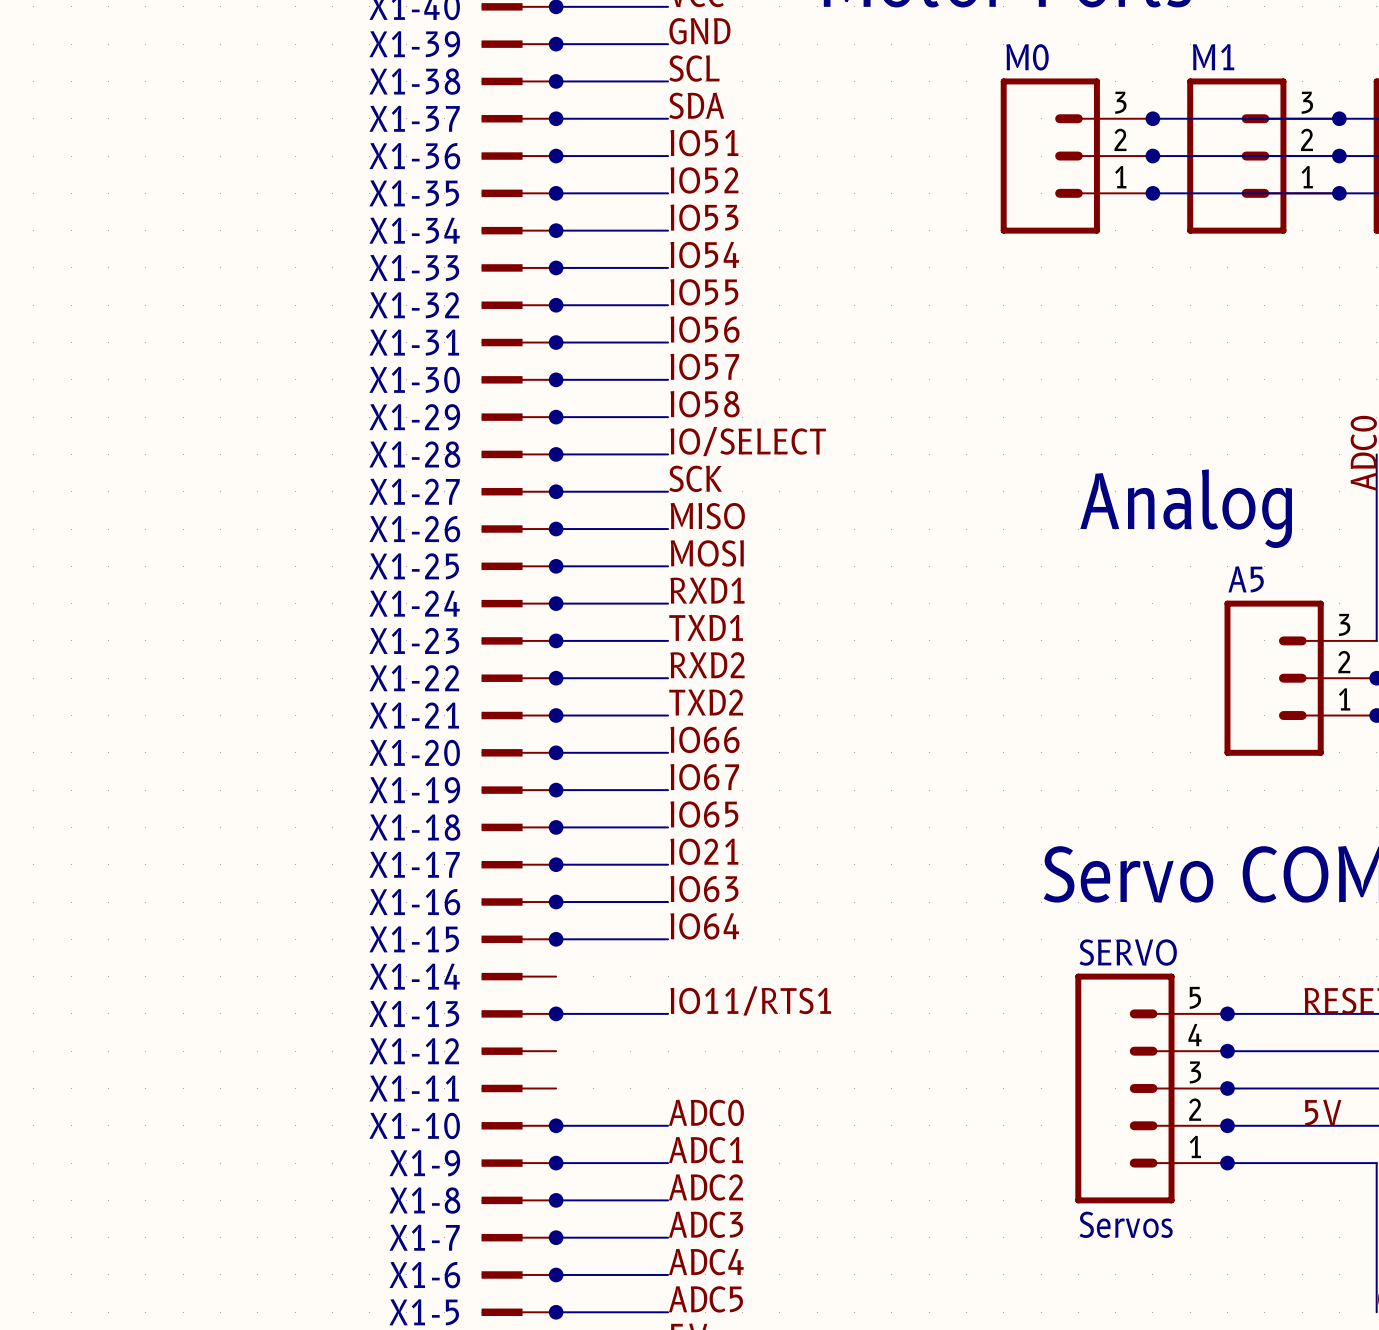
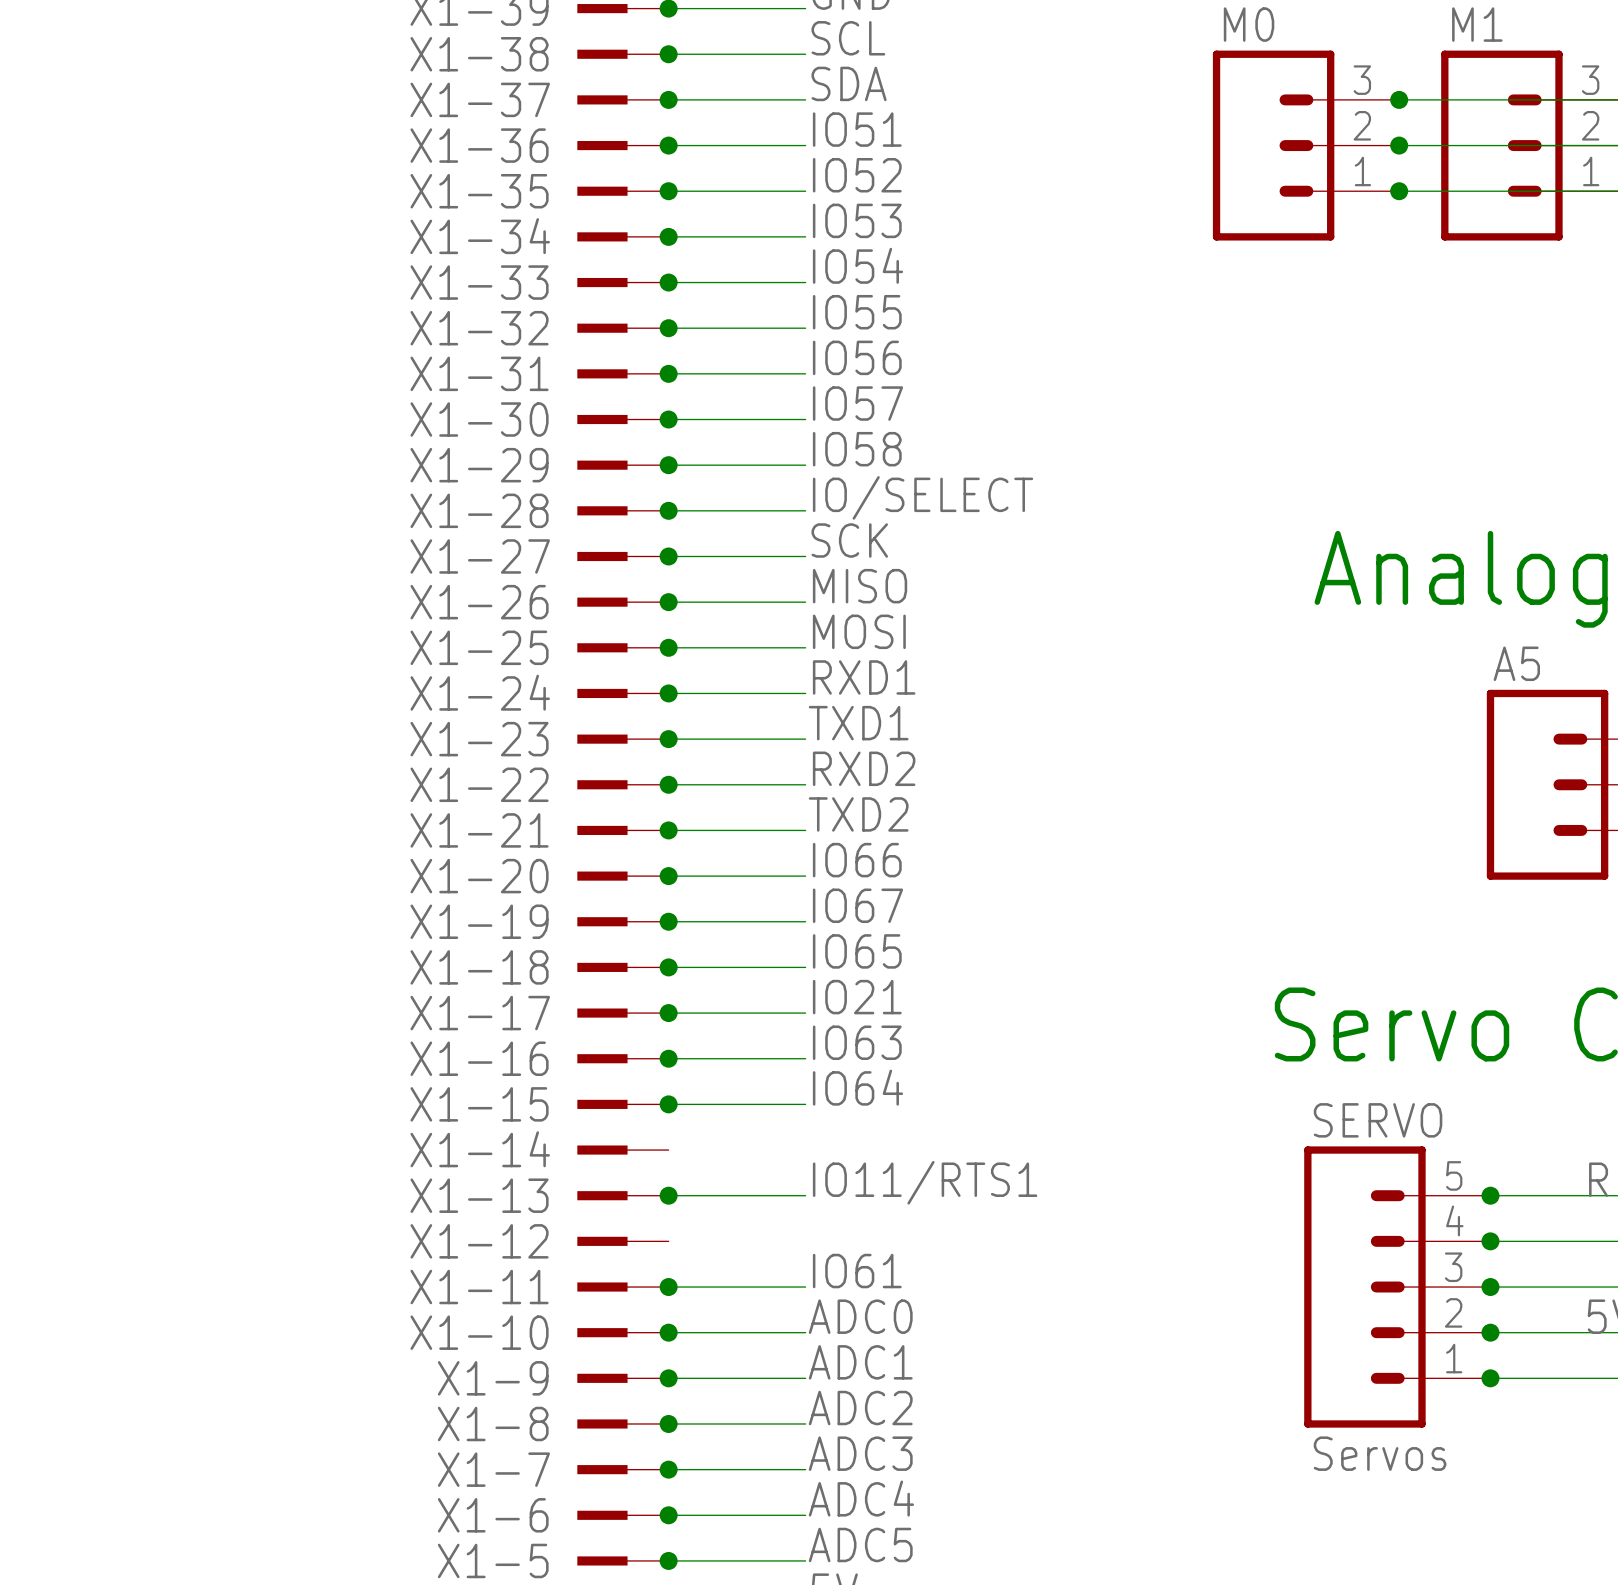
label: none -> IO61 (857, 1271)
wire: none -> (668, 1287) (805, 1287)
junction: none -> (668, 1287)

